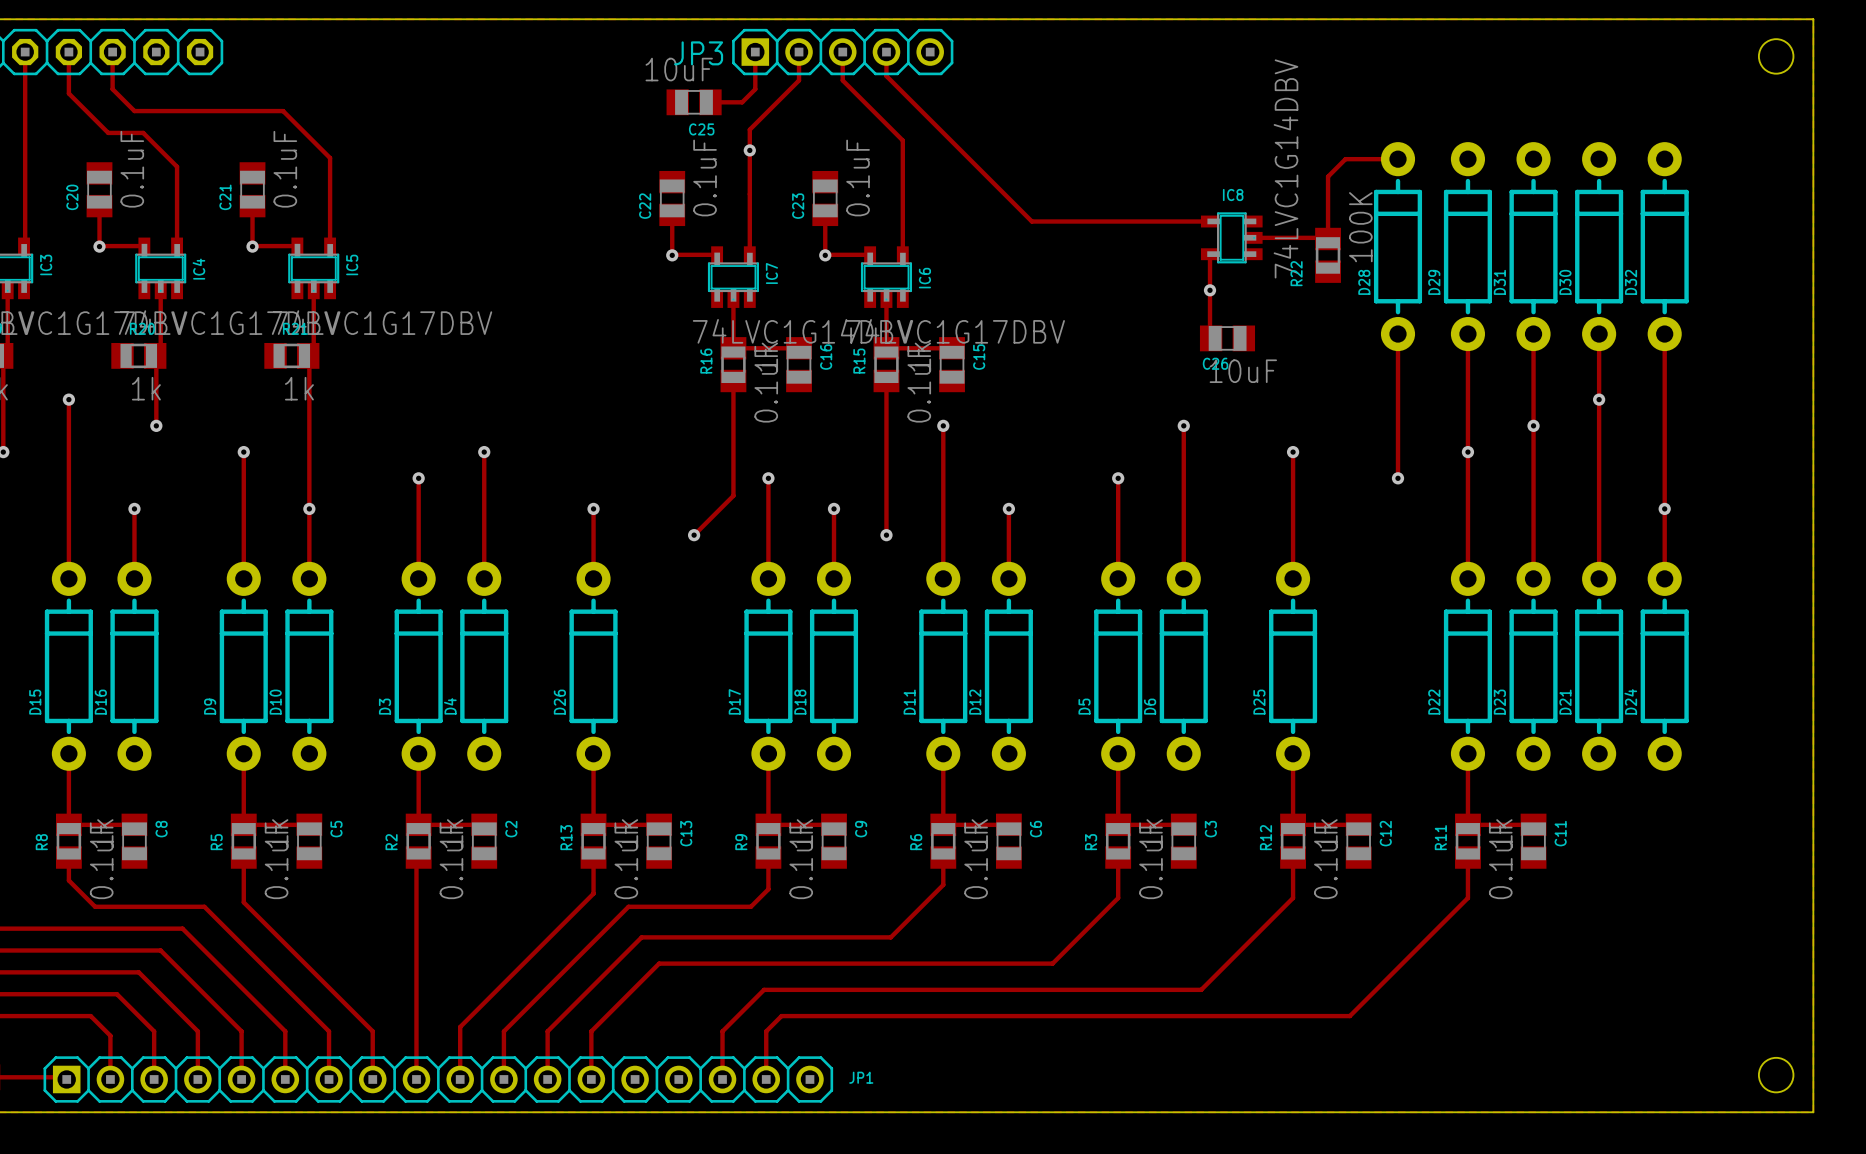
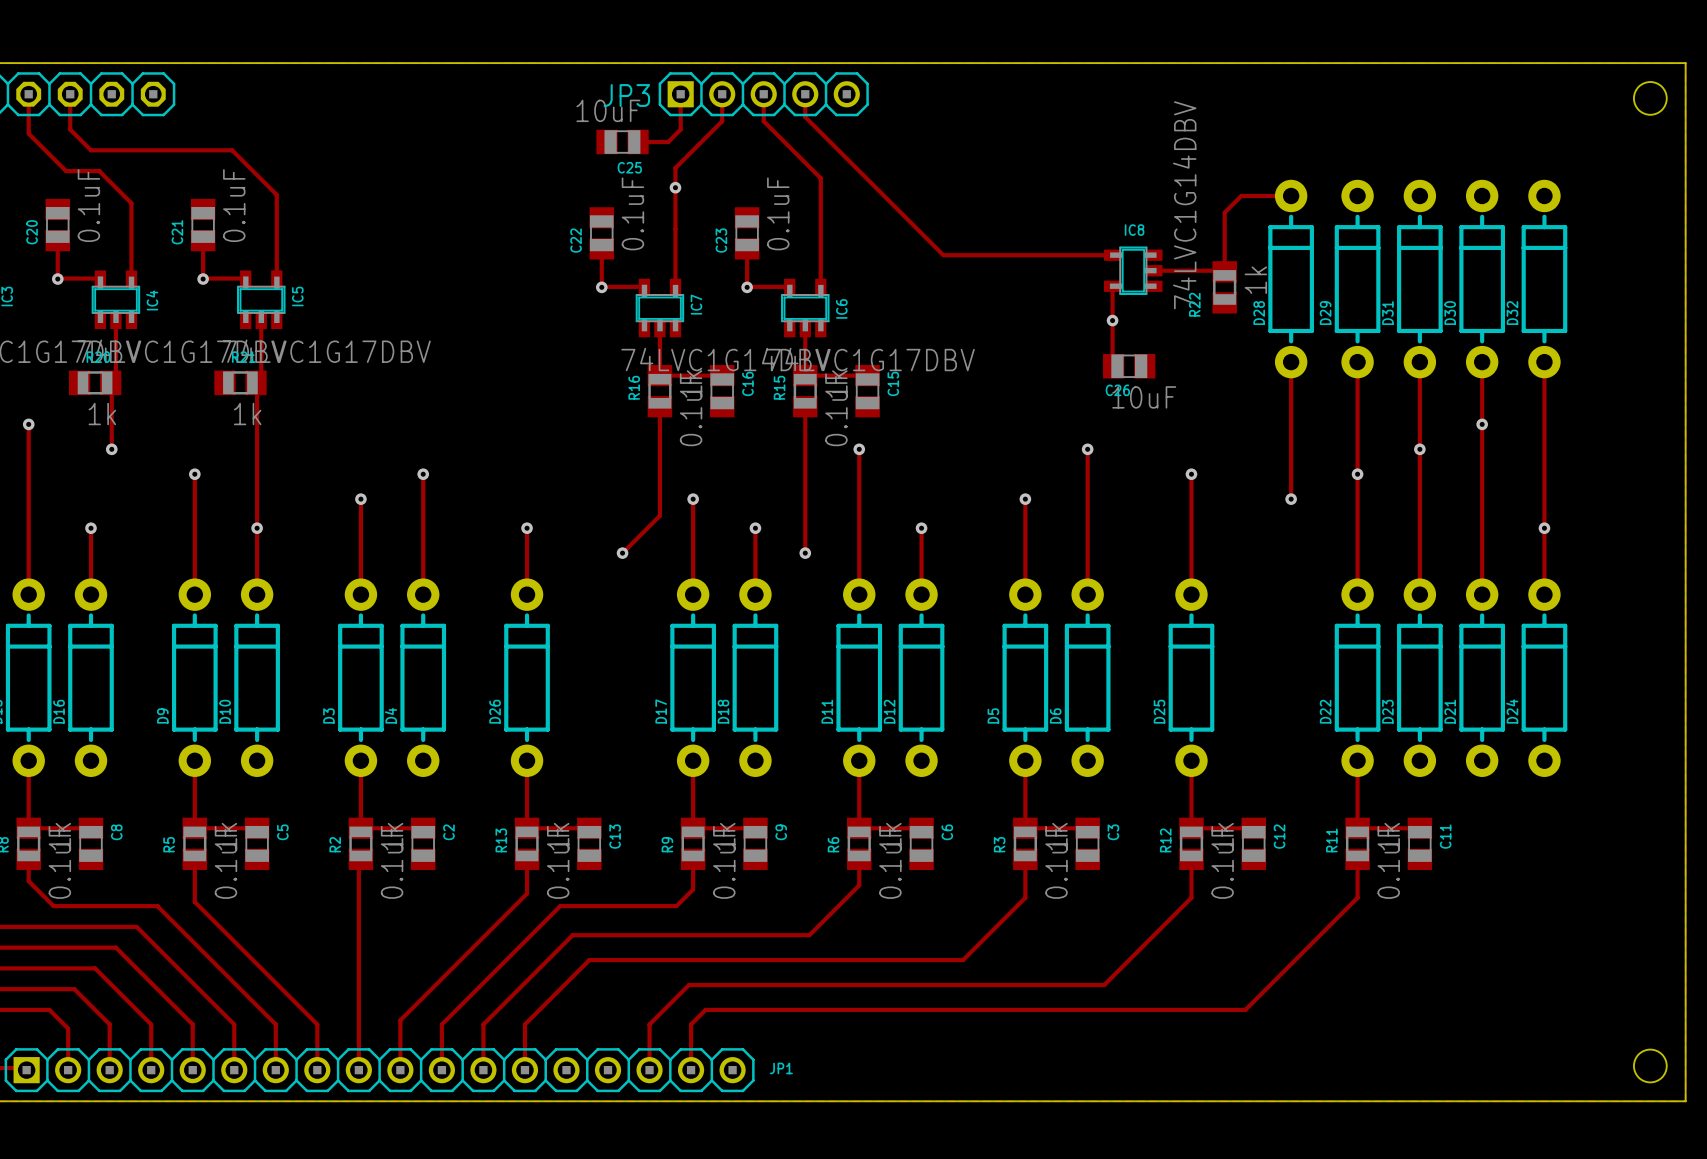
R22 value: 100K (1360, 227) -> 1k (1255, 280)

